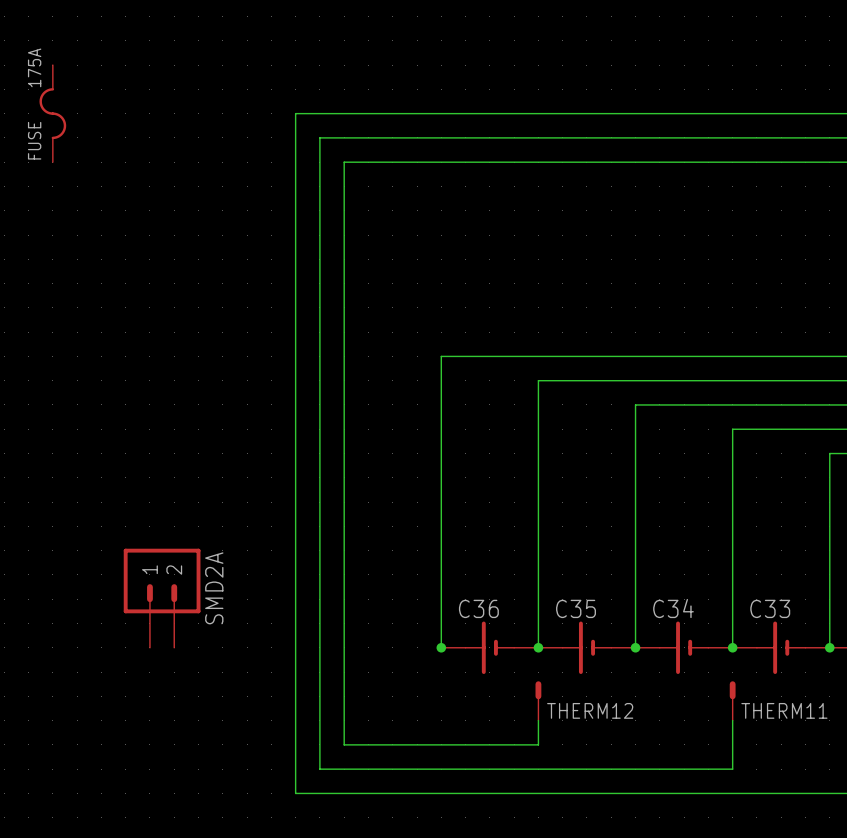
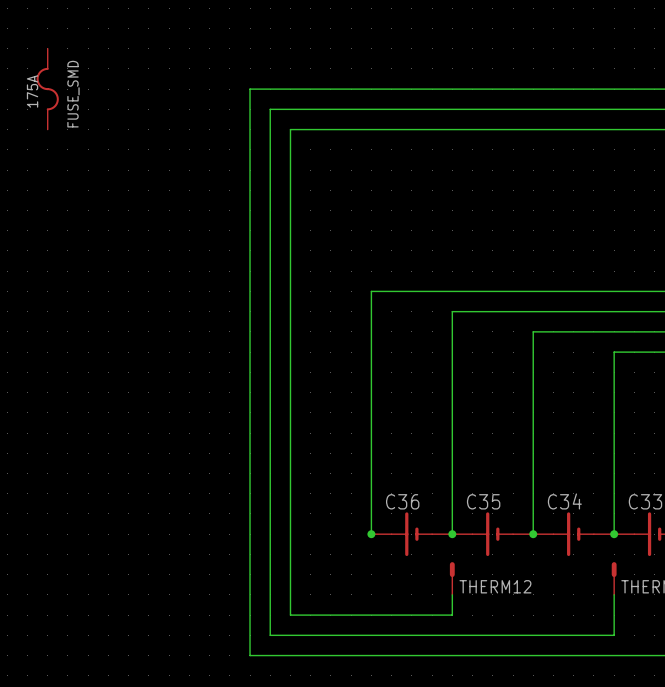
FUSE value position: 175A (34, 67) -> 175A (32, 91)
FUSE name: FUSE (34, 140) -> FUSE_SMD (73, 94)
SMD2A: (162, 598) -> none

